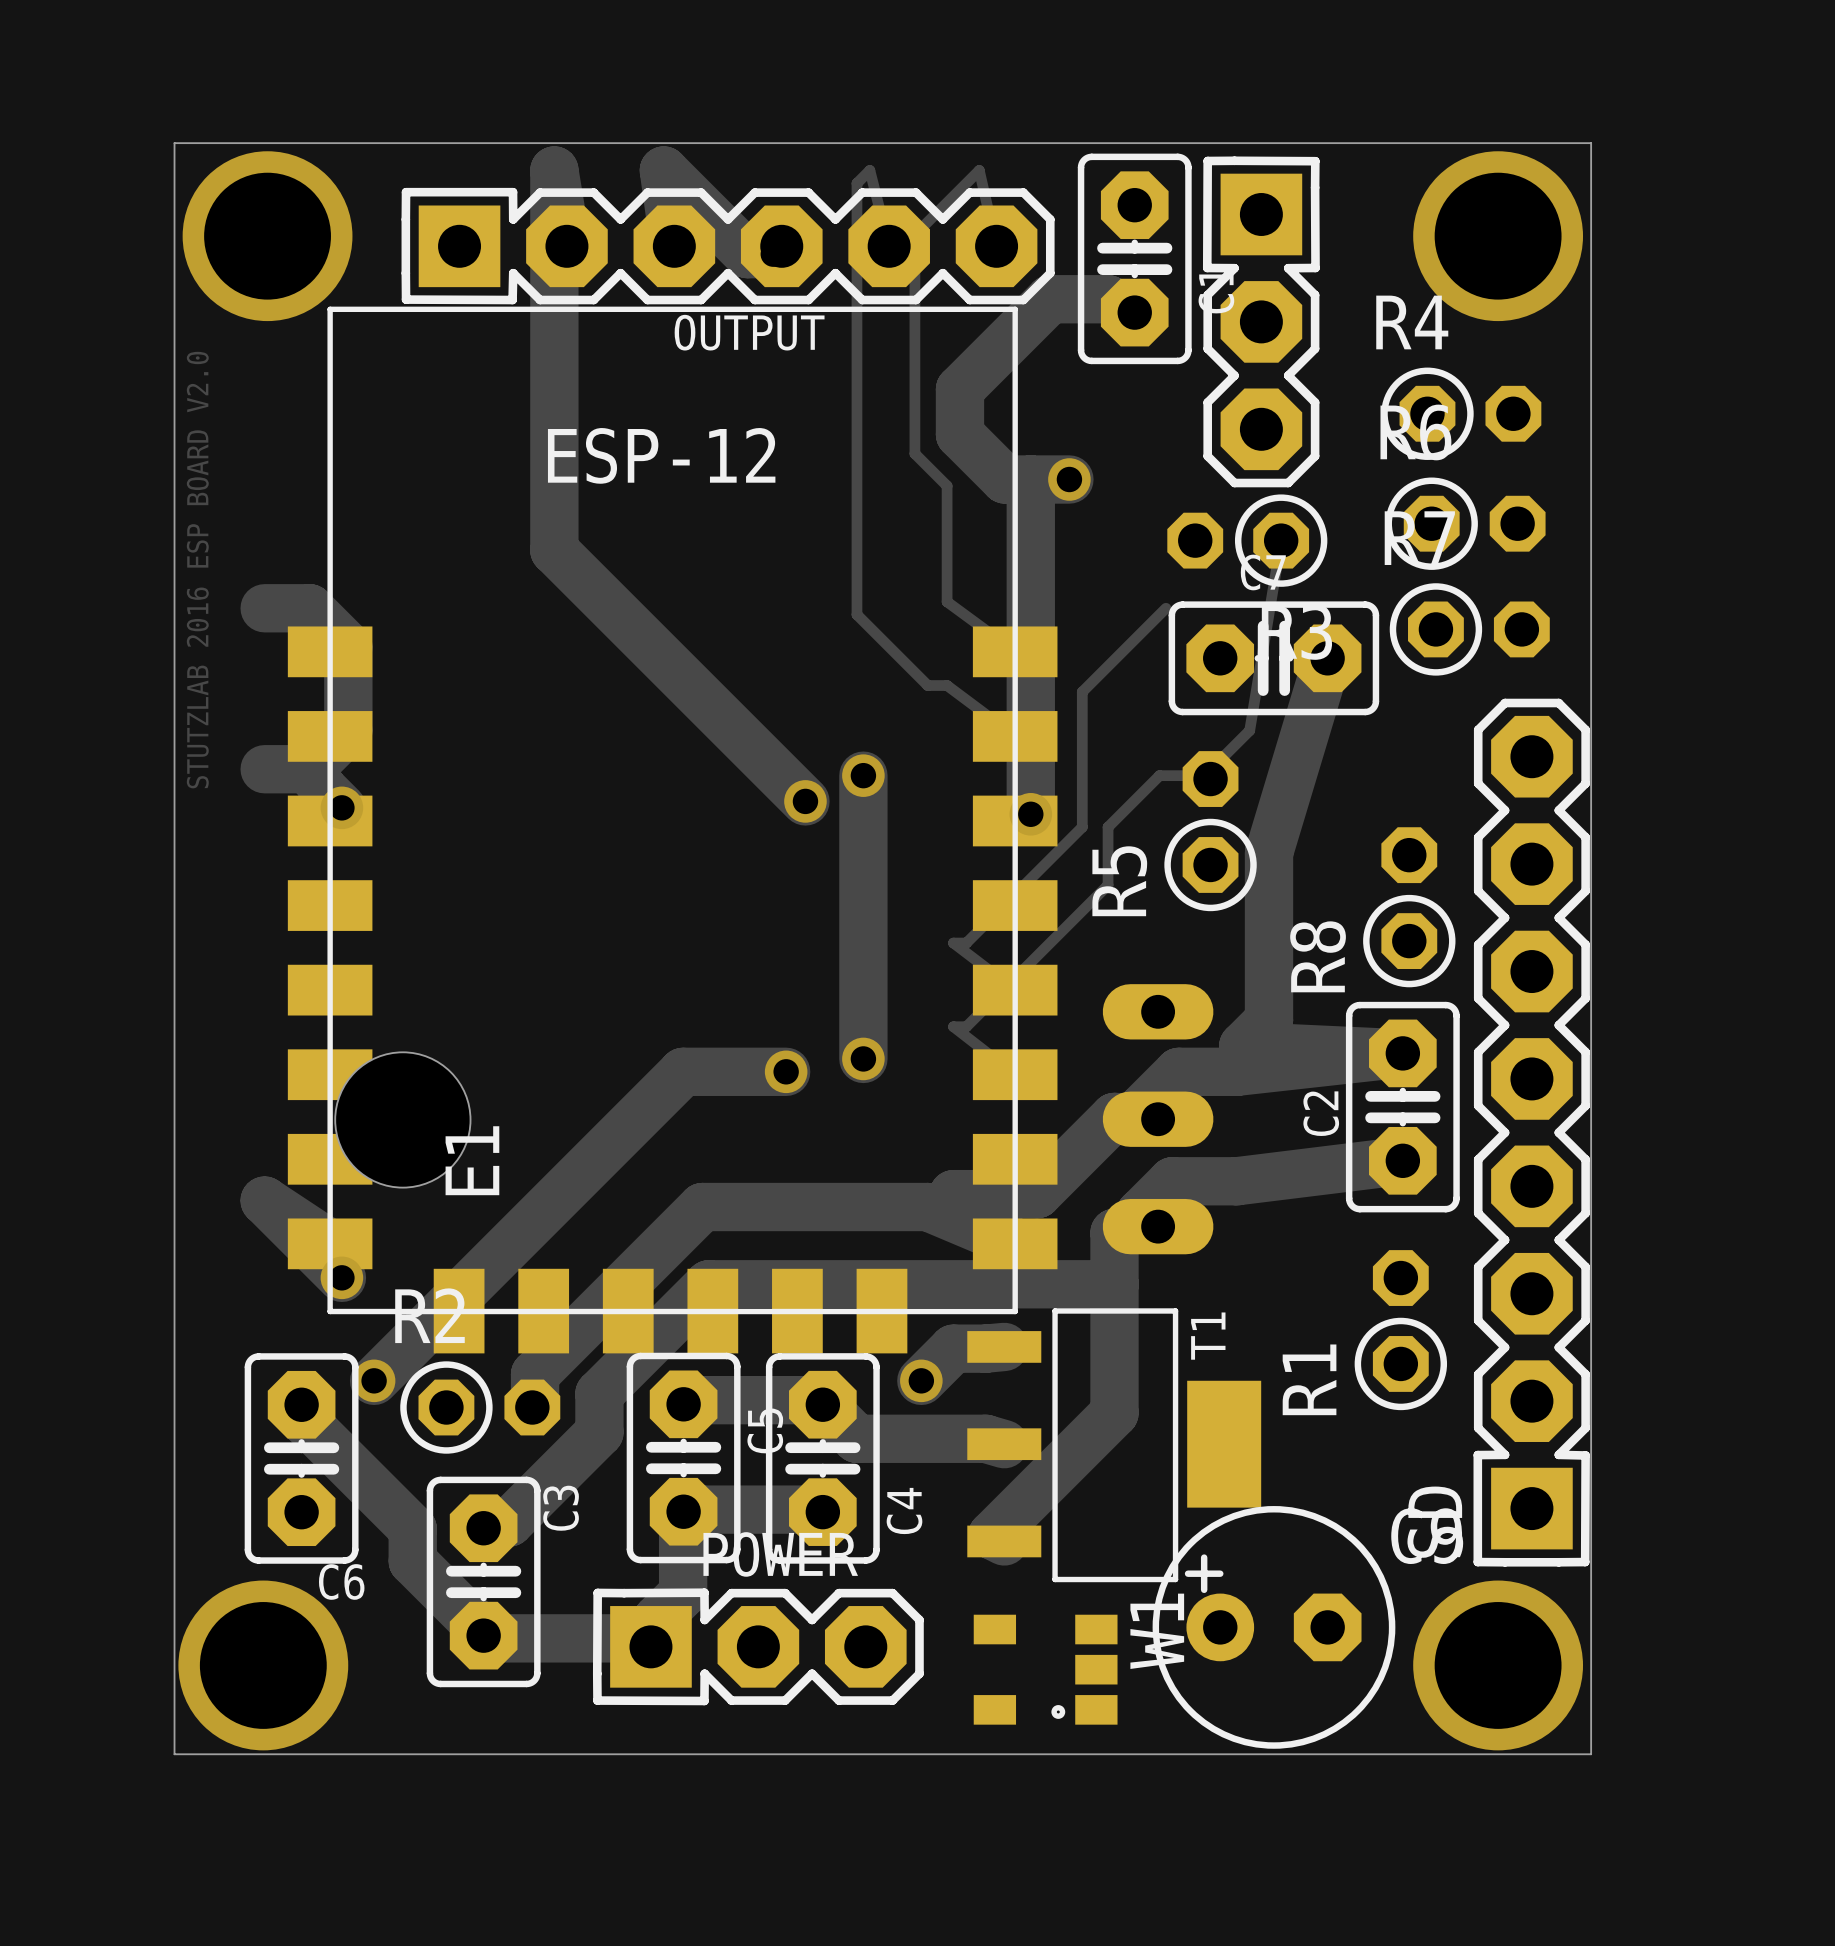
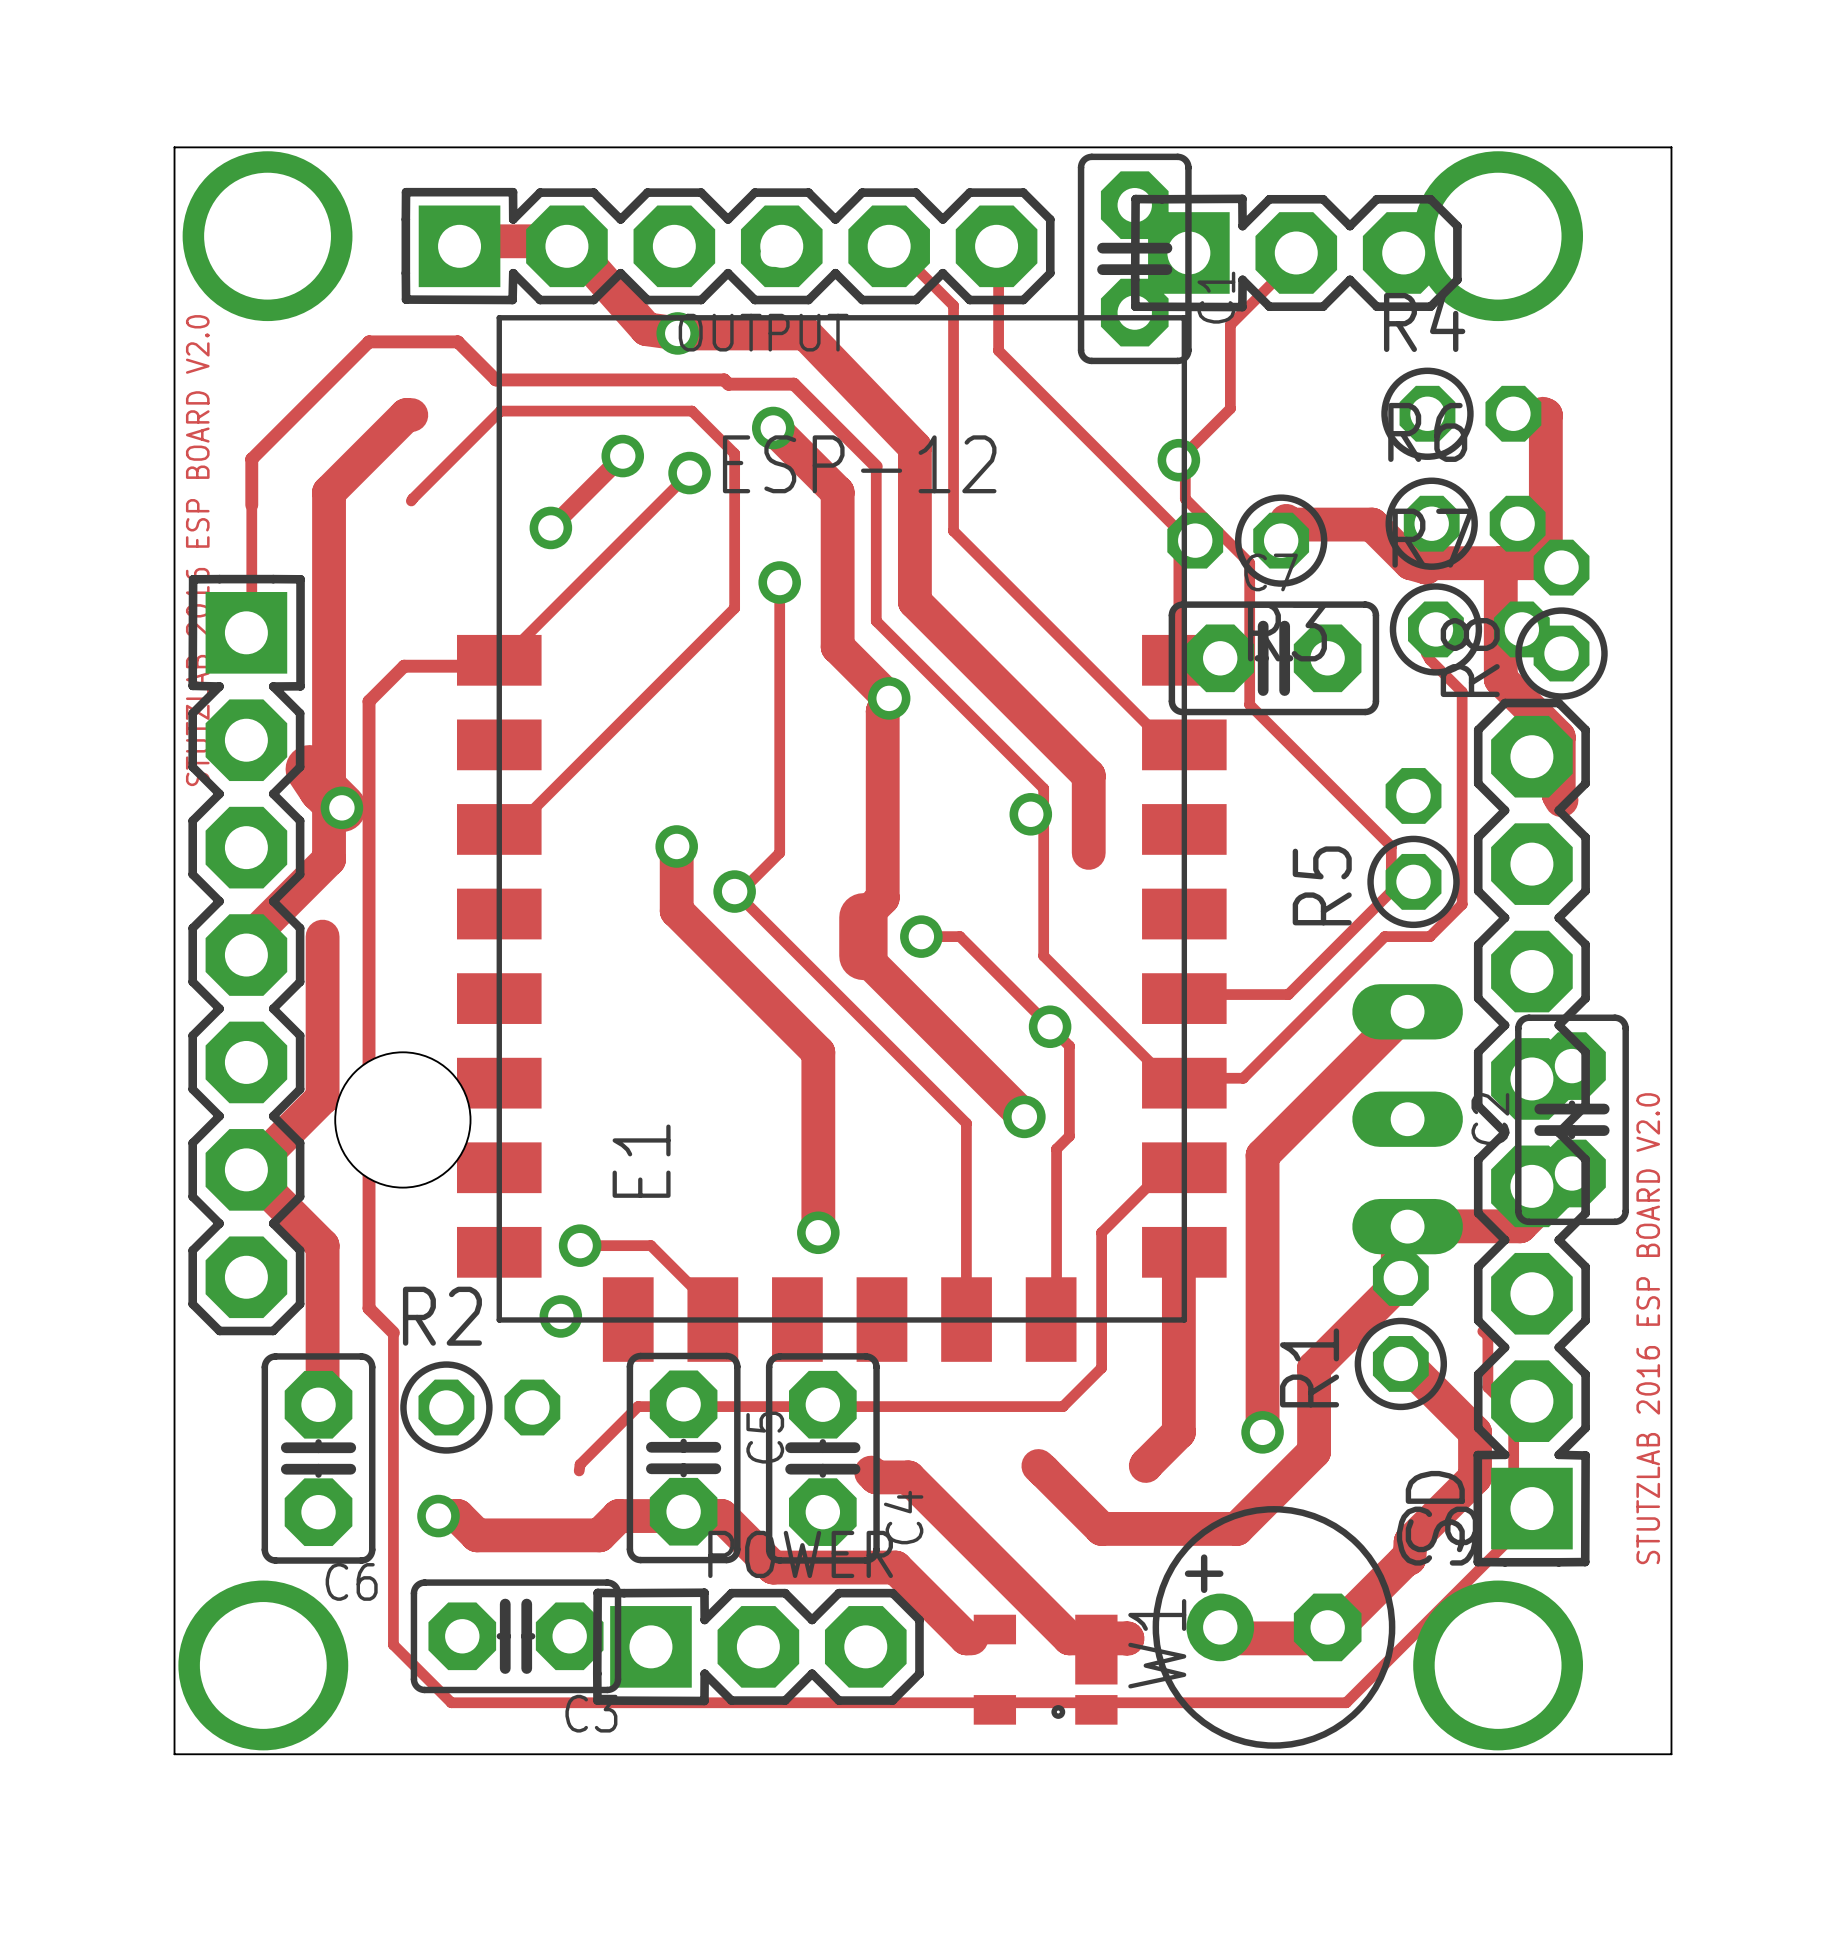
board edge: (174, 147) (174, 143) (1591, 143) (1591, 1754) -> (174, 147) (1671, 147) (1671, 1754) (1591, 1754)
track: none -> (459, 246) (464, 241) (560, 241) (580, 254) (646, 329) (677, 333) (805, 333) (914, 447)
track: (566, 246) (554, 170) (554, 550) (805, 801) -> none
track: (674, 246) (663, 170) (747, 254) (773, 254) -> none
track: (889, 246) (869, 170) (856, 183) (856, 614) (927, 685) (947, 685) (1015, 736) -> (889, 246) (895, 247) (953, 305) (953, 531) (1166, 743) (1184, 744)
track: (996, 246) (979, 170) (914, 234) (914, 447) -> (996, 246) (998, 247) (998, 350) (1178, 531) (1178, 659) (1184, 660)
track: none -> (1296, 252) (1301, 254) (1230, 324) (1230, 408) (1178, 460) (1185, 460) (1185, 498) (1249, 563) (1249, 704) (1391, 846) (1391, 885) (1413, 881) (1410, 885) (1397, 885) (1288, 994) (1185, 994) (1184, 998)
track: (1134, 312) (1108, 299) (1050, 299) (959, 389) (959, 434) (1005, 479) (1069, 479) -> none
part rotation: 0° (1261, 321) -> 90° counterclockwise (1296, 252)
via: none -> (677, 333)
track: none -> (1543, 413) (1545, 415) (1545, 550) (1561, 567) (1558, 563) (1429, 563) (1426, 567) (1410, 563) (1372, 524) (1288, 524) (1286, 520)
track: none -> (411, 415) (406, 415) (329, 492) (329, 859) (251, 936) (251, 949) (246, 955)
via: none -> (773, 428)
track: (914, 453) (947, 485) (947, 601) (1015, 651) -> (914, 453) (914, 601) (1088, 775) (1088, 852)
track: none -> (622, 456) (550, 527)
via: none -> (622, 456)
track: none -> (689, 473) (502, 659) (499, 660) (496, 666) (404, 666) (369, 701) (369, 1308) (393, 1332) (393, 1644) (451, 1702) (1346, 1702) (1513, 1535) (1513, 1413) (1487, 1387) (1487, 1335) (1482, 1331)
via: none -> (689, 473)
track: (1030, 479) (1030, 814) -> none
via position: (1069, 479) -> (1178, 460)
track: none -> (411, 500) (500, 411) (691, 411) (734, 453) (734, 608) (515, 827) (502, 827) (499, 829)
via: none -> (550, 527)
track: (1281, 540) (1249, 730) (1204, 775) (1159, 775) (1108, 827) (1108, 885) (966, 1026) (953, 1026) (1015, 1074) -> none
track: none -> (1500, 563) (1500, 679) (1558, 737) (1558, 794) (1561, 800)
track: none -> (779, 582) (779, 852) (741, 891) (734, 891) (966, 1123) (966, 1319)
via: none -> (779, 582)
track: (264, 608) (309, 608) (348, 646) (348, 730) (309, 769) (264, 769) -> none
track: (1166, 608) (1082, 691) (1082, 827) (966, 943) (953, 943) (1015, 990) -> none
track: none -> (246, 632) (251, 627) (251, 459) (369, 341) (457, 341) (495, 379) (724, 379) (728, 384) (793, 384) (876, 466) (876, 621) (1043, 788) (1043, 955) (1166, 1078) (1178, 1078) (1184, 1083) (1185, 1078) (1243, 1078) (1384, 936) (1429, 936) (1462, 904) (1462, 691) (1429, 659) (1426, 653)
track: (1327, 658) (1269, 852) (1269, 1020) (1243, 1046) (1402, 1053) (1236, 1071) (1178, 1071) (1140, 1110) (1158, 1119) (1114, 1116) (1037, 1194) (953, 1194) (1015, 1243) (927, 1207) (702, 1207) (535, 1374) (535, 1406) (532, 1407) -> none
via: none -> (889, 698)
track: (863, 775) (863, 917) -> (773, 428) (837, 492) (837, 646) (889, 698) (882, 711) (882, 897) (863, 917)
via: (863, 775) -> none
via: (805, 801) -> none
E1 position: (672, 830) -> (841, 838)
R5 position: (1210, 831) -> (1413, 848)
track: none -> (676, 846) (676, 910) (818, 1052) (818, 1232)
via: none -> (676, 846)
via: none -> (734, 891)
R8 position: (1409, 907) -> (1561, 619)
track: none -> (322, 936) (322, 1097) (258, 1161) (246, 1169) (322, 1245) (322, 1400) (318, 1404)
track: none -> (921, 936) (959, 936) (1069, 1046) (1069, 1136) (1056, 1149) (1056, 1316) (1051, 1319)
via: none -> (921, 936)
part: none -> (246, 955)
track: (863, 955) (863, 1058) -> (863, 955) (1024, 1116)
track: none -> (1407, 1011) (1262, 1155) (1262, 1432)
via: none -> (1050, 1026)
via: (863, 1058) -> none
track: (786, 1071) (683, 1071) (374, 1380) -> none
via: (786, 1071) -> none
C2 position: (1402, 1107) -> (1571, 1119)
via: none -> (1024, 1116)
part position: (1158, 1119) -> (1407, 1119)
track: (1402, 1160) (1236, 1181) (1172, 1181) (1140, 1213) (1158, 1226) (1114, 1232) (1114, 1413) (992, 1535) (1004, 1541) -> none
track: none -> (1184, 1167) (1166, 1168) (1101, 1232) (1101, 1367) (1062, 1406) (638, 1406) (580, 1464) (579, 1470)
track: none -> (1571, 1173) (1520, 1226) (1407, 1226) (1397, 1239) (1397, 1284) (1314, 1367) (1314, 1451) (1236, 1528) (1101, 1528) (1038, 1465)
via: none -> (818, 1232)
track: (330, 1243) (264, 1200) (341, 1277) -> none
track: none -> (580, 1245) (650, 1245) (708, 1303) (708, 1316) (712, 1319)
via: none -> (580, 1245)
track: none -> (1184, 1252) (1178, 1258) (1178, 1432) (1145, 1465)
via: (341, 1277) -> none
track: (1114, 1284) (708, 1284) (599, 1393) (599, 1432) (509, 1522) (489, 1522) (483, 1528) -> none
via: none -> (560, 1316)
track: (1004, 1346) (953, 1348) (921, 1380) -> none
text: none -> STUTZLAB 2016 ESP BOARD V2.0 (1648, 1328)
track: none -> (1397, 1355) (1475, 1432) (1475, 1477) (1410, 1541) (1409, 1558) (1404, 1561) (1326, 1638) (1234, 1638)
via: (374, 1380) -> none
via: (921, 1380) -> none
track: (301, 1404) (303, 1419) (412, 1528) (412, 1561) (470, 1619) (483, 1635) (489, 1638) (644, 1638) (650, 1646) (657, 1619) (683, 1593) (683, 1511) (702, 1509) (818, 1509) (822, 1512) -> none
track: (683, 1404) (689, 1400) (799, 1400) (822, 1404) (856, 1438) (985, 1438) (1004, 1444) -> none
via: none -> (1262, 1432)
T1: (1114, 1445) -> none
C6 position: (301, 1458) -> (318, 1458)
track: none -> (871, 1472) (876, 1477) (908, 1477) (1069, 1638) (1127, 1638)
track: none -> (438, 1516) (457, 1516) (477, 1535) (599, 1535) (618, 1516) (721, 1516) (773, 1567) (895, 1567) (966, 1638) (971, 1638)
via: none -> (438, 1516)
C3 rotation: 0° (483, 1581) -> 90° clockwise (515, 1636)

